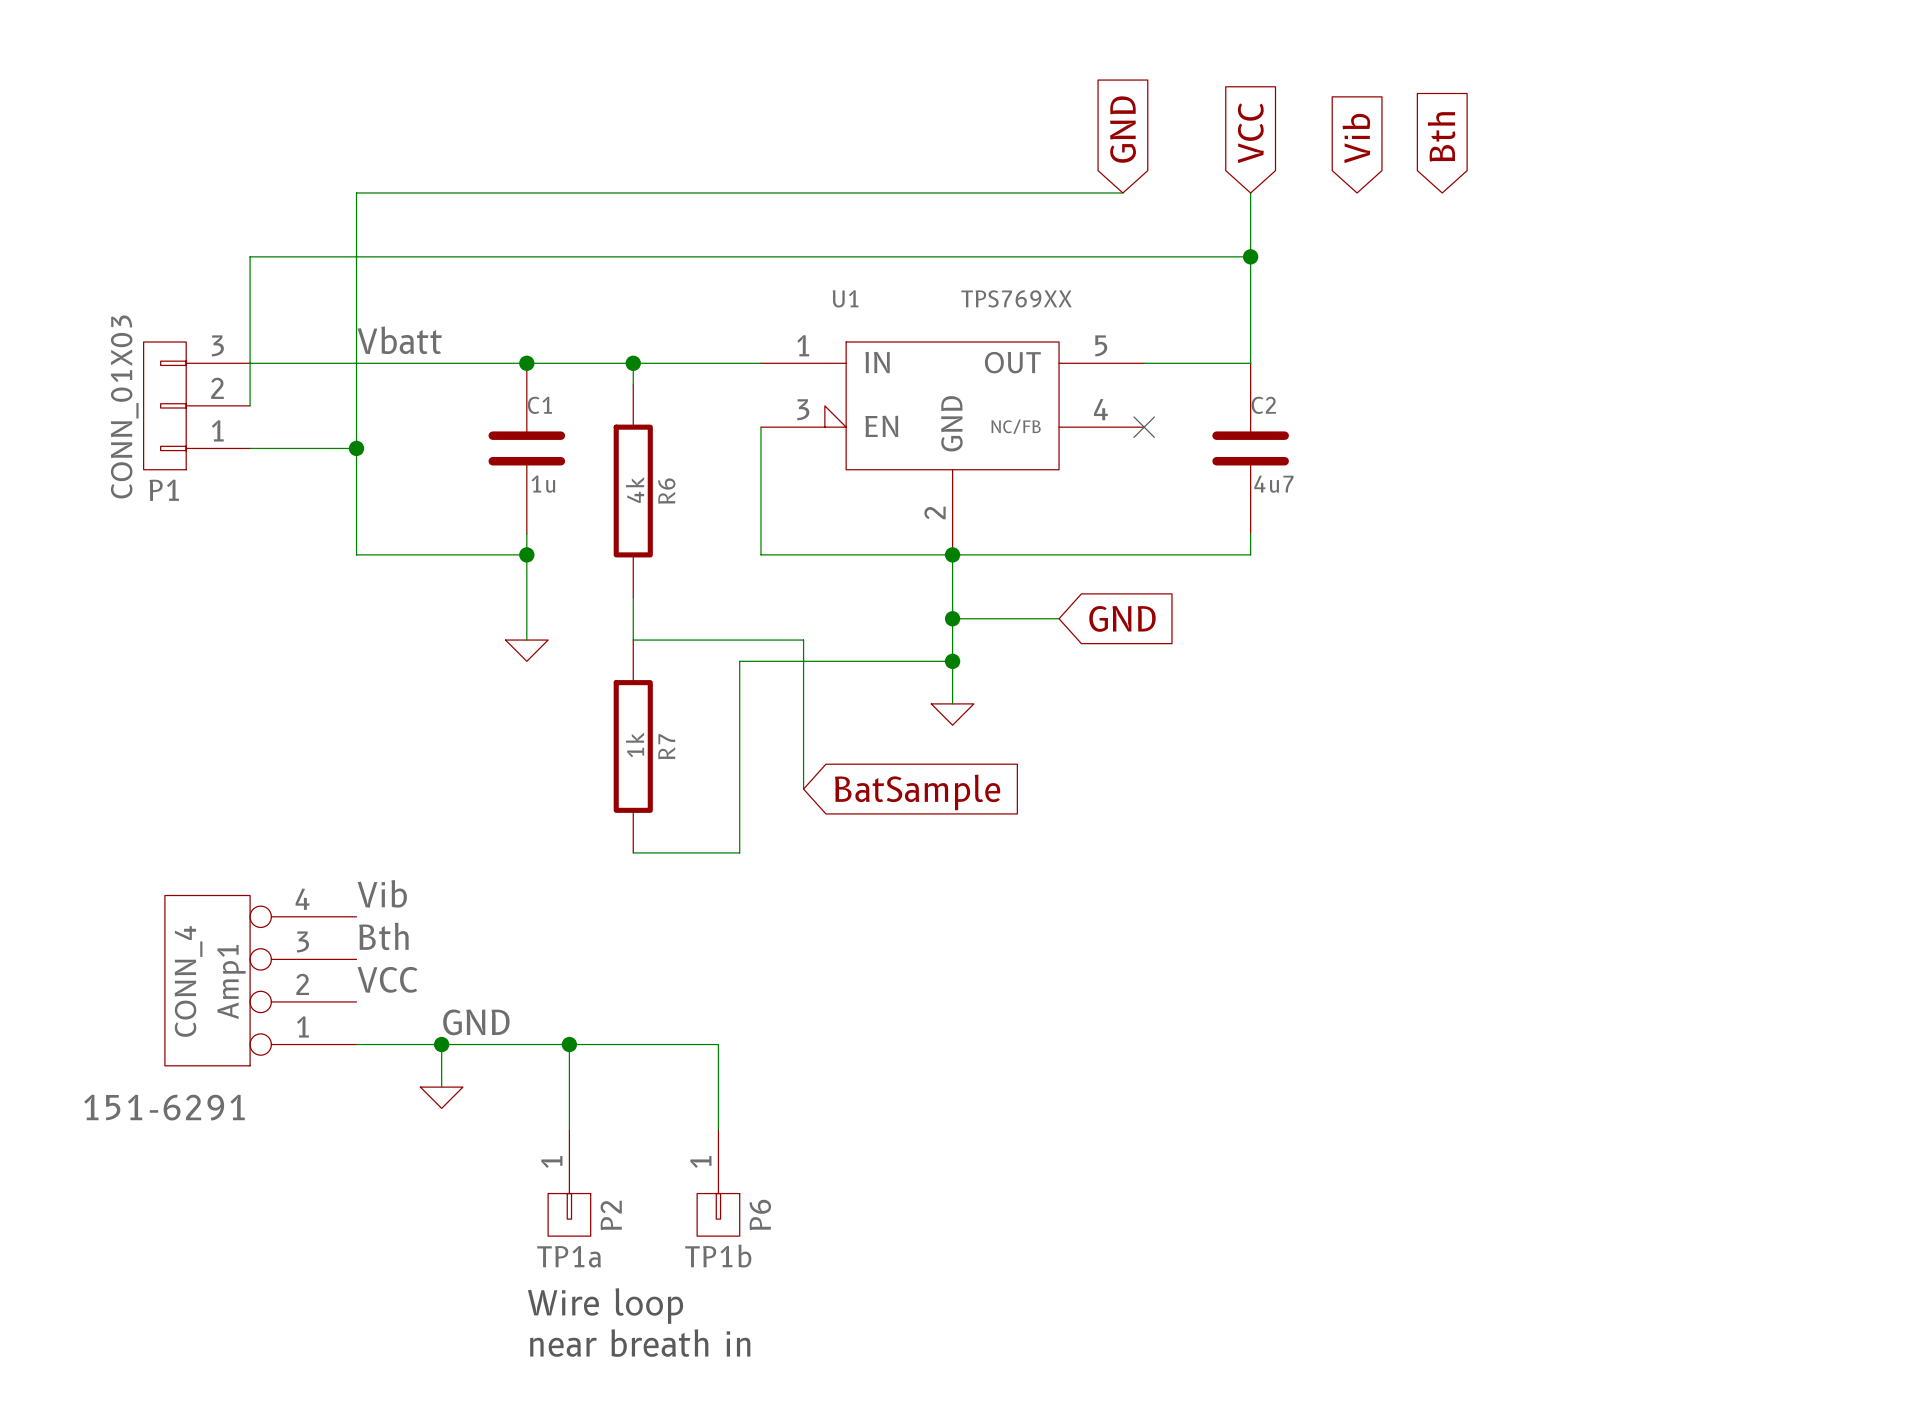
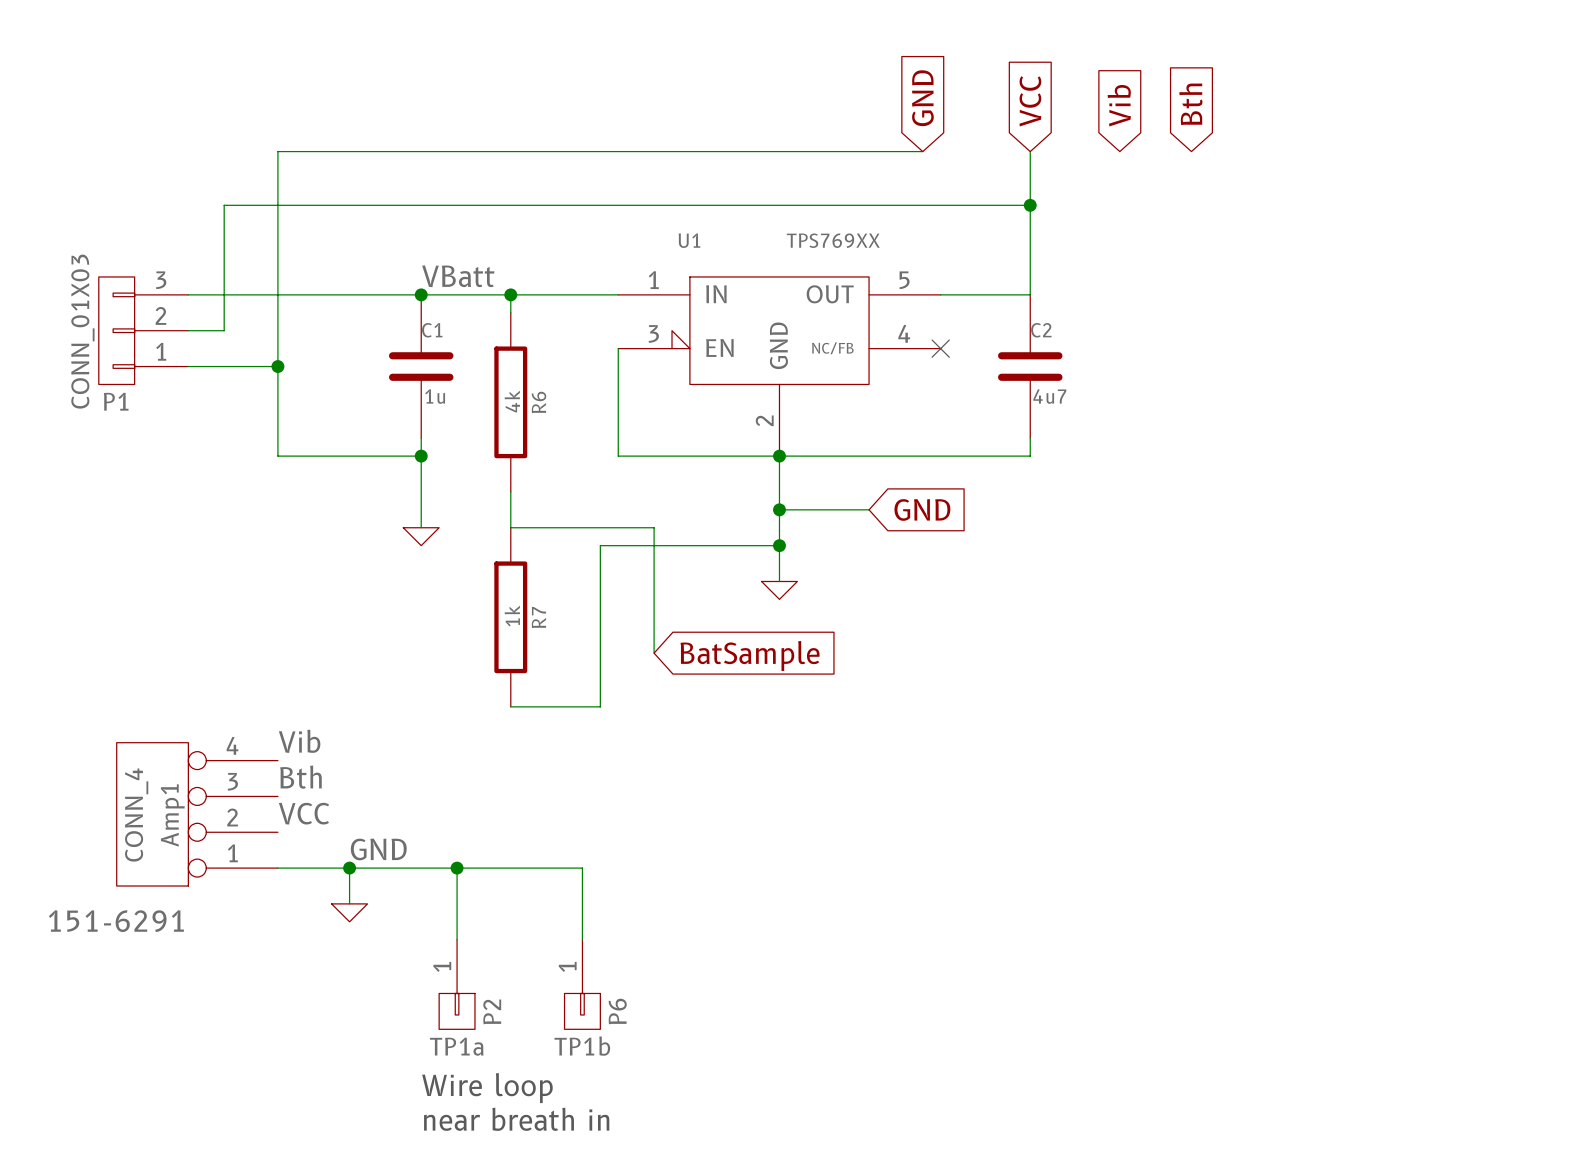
wire: (292, 256) (250, 256) (250, 405) -> (224, 205) (224, 330) (188, 330)
label: Vbatt (399, 340) -> none
label: none -> VBatt (458, 276)

